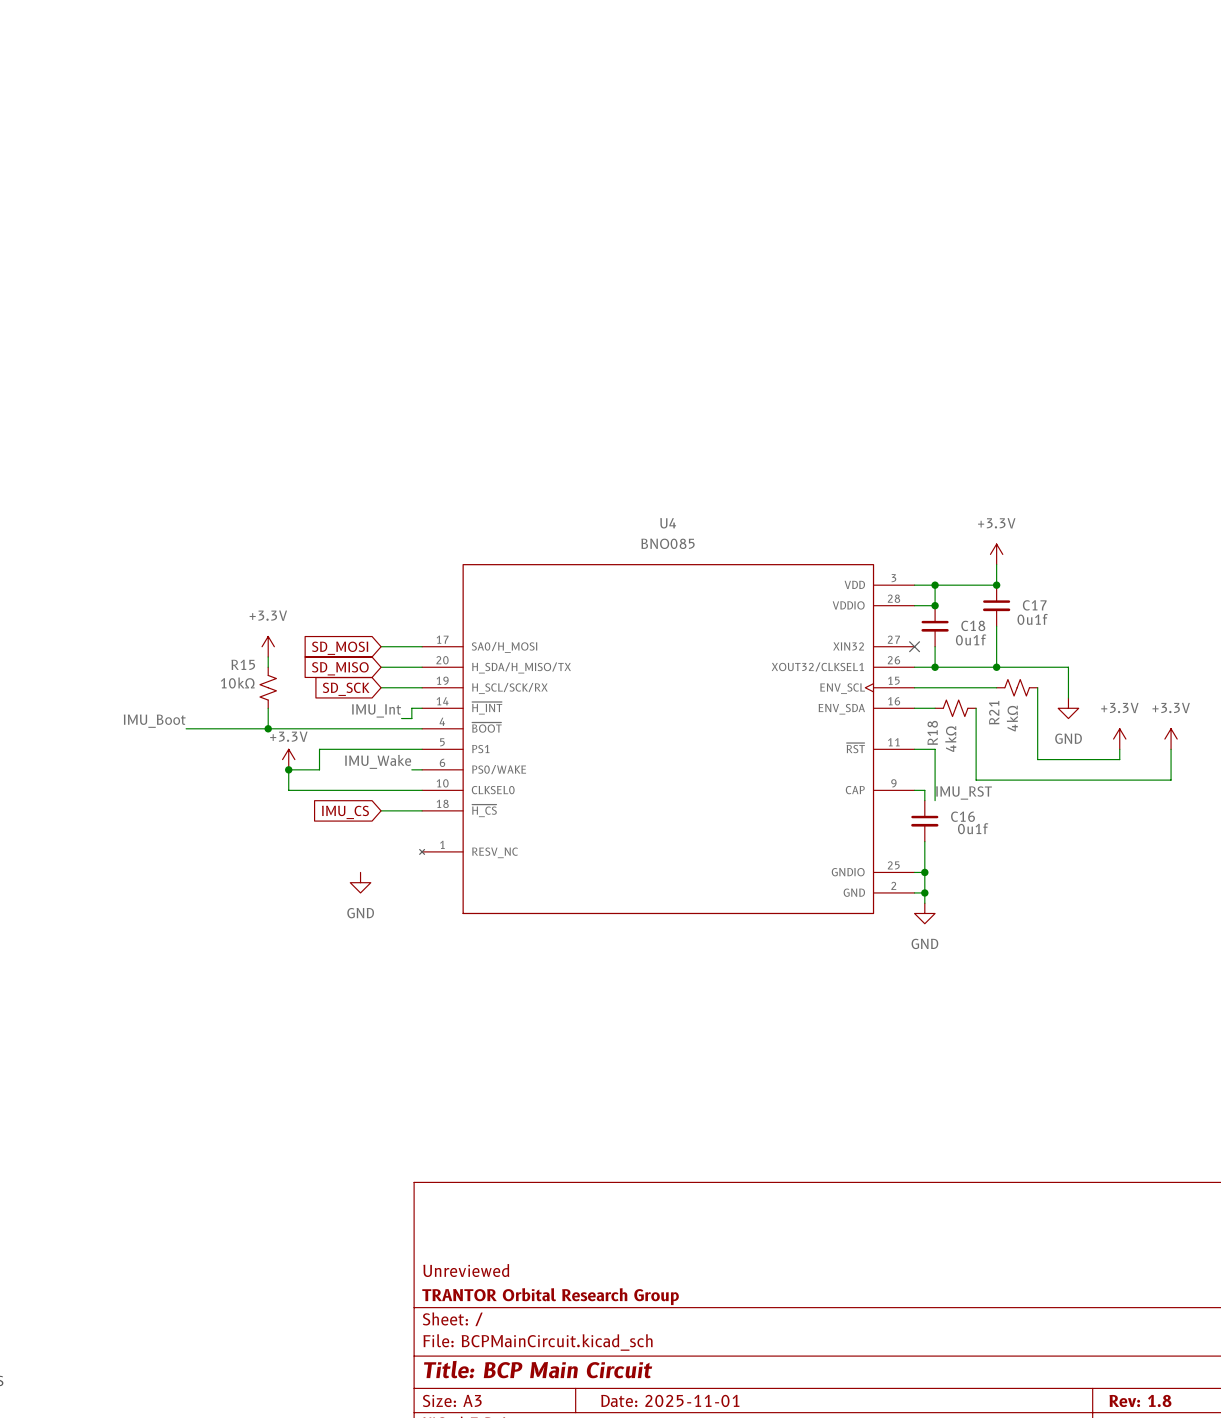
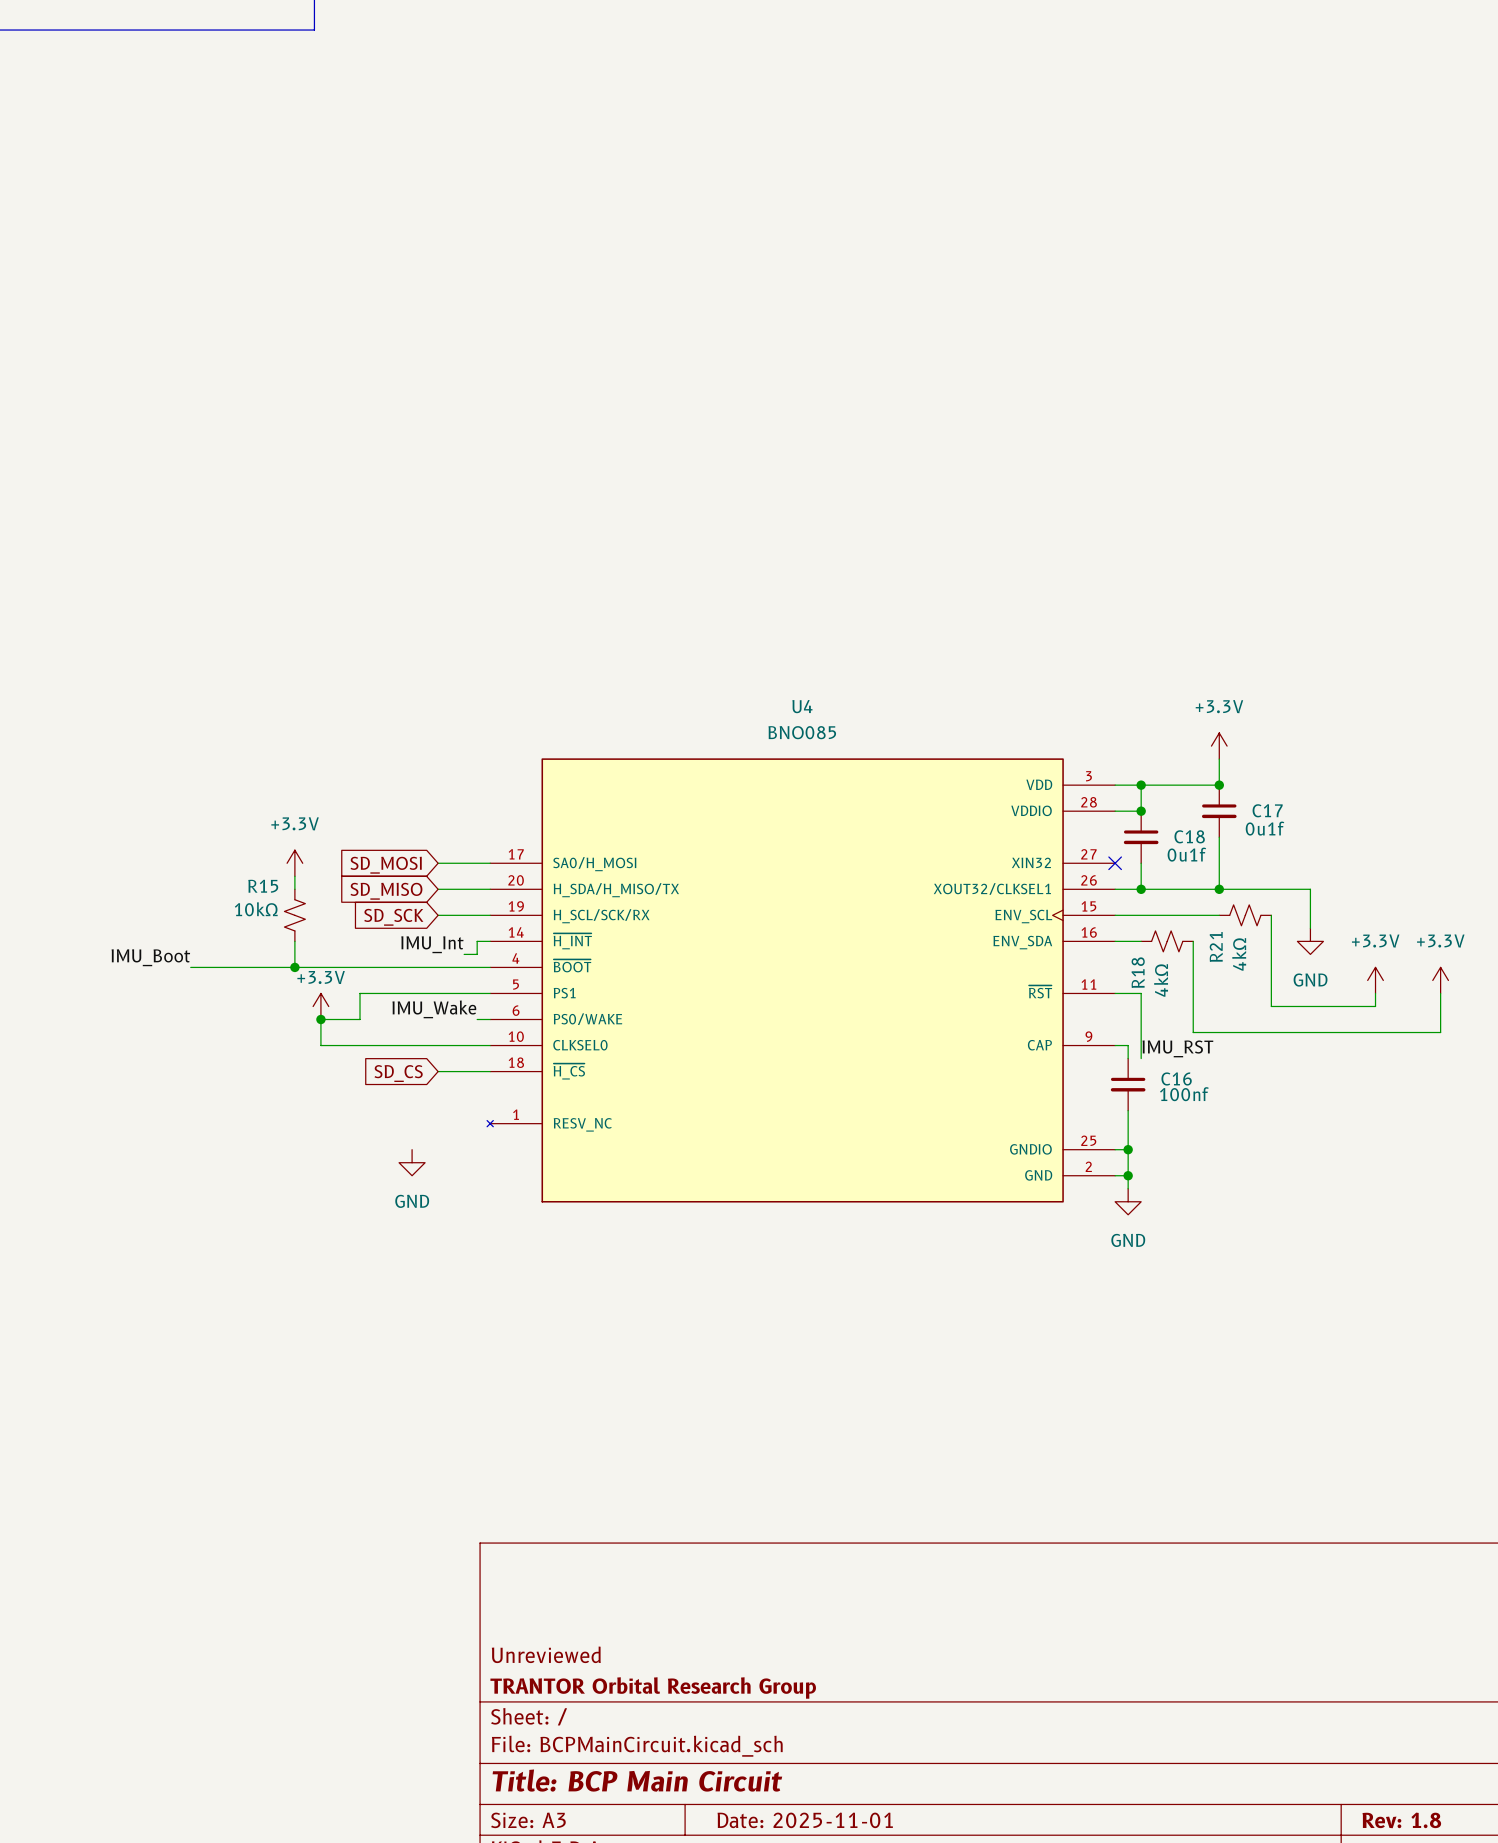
global label: IMU_CS (345, 812) -> SD_CS (398, 1073)
C16 value: 0u1f (973, 828) -> 100nf (1184, 1094)

